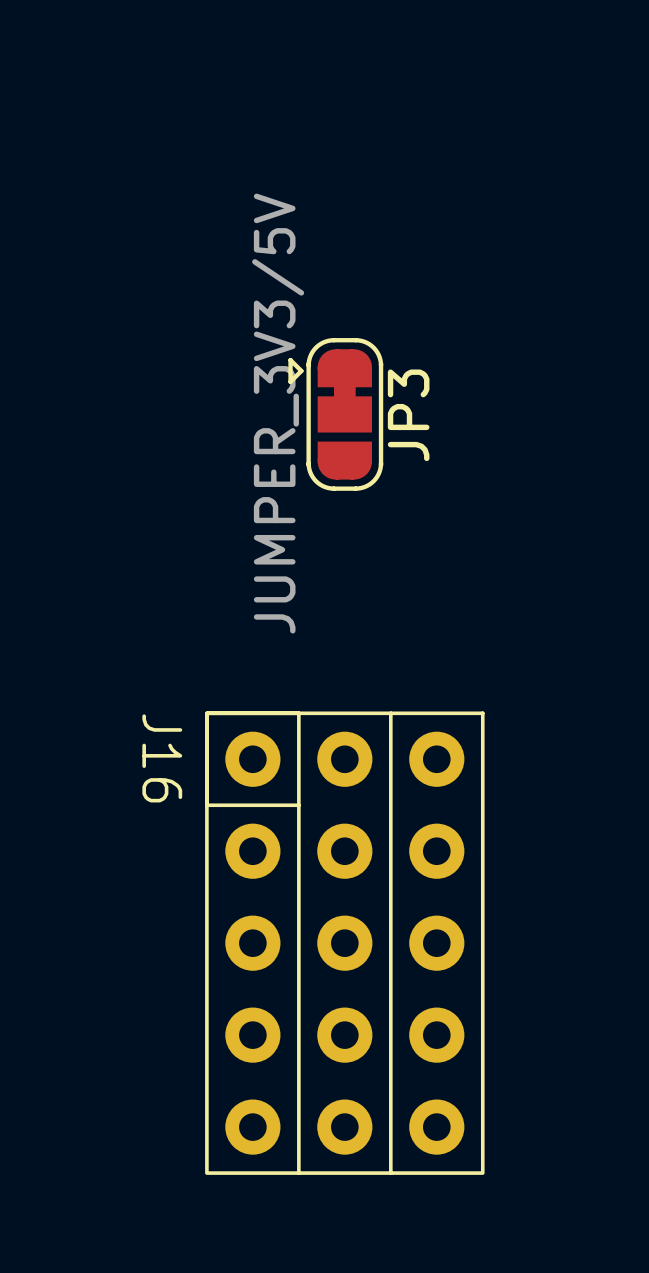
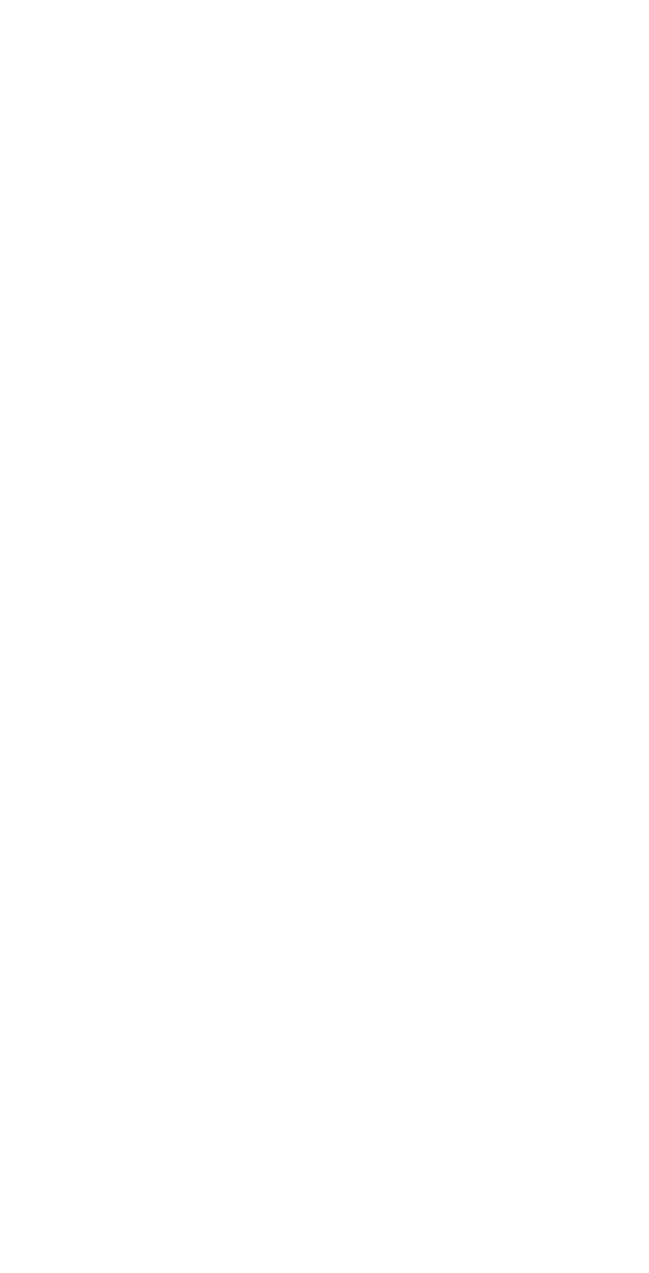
JP3: JUMPER_3V3/5V (335, 414) -> none
J16: (344, 943) -> none

